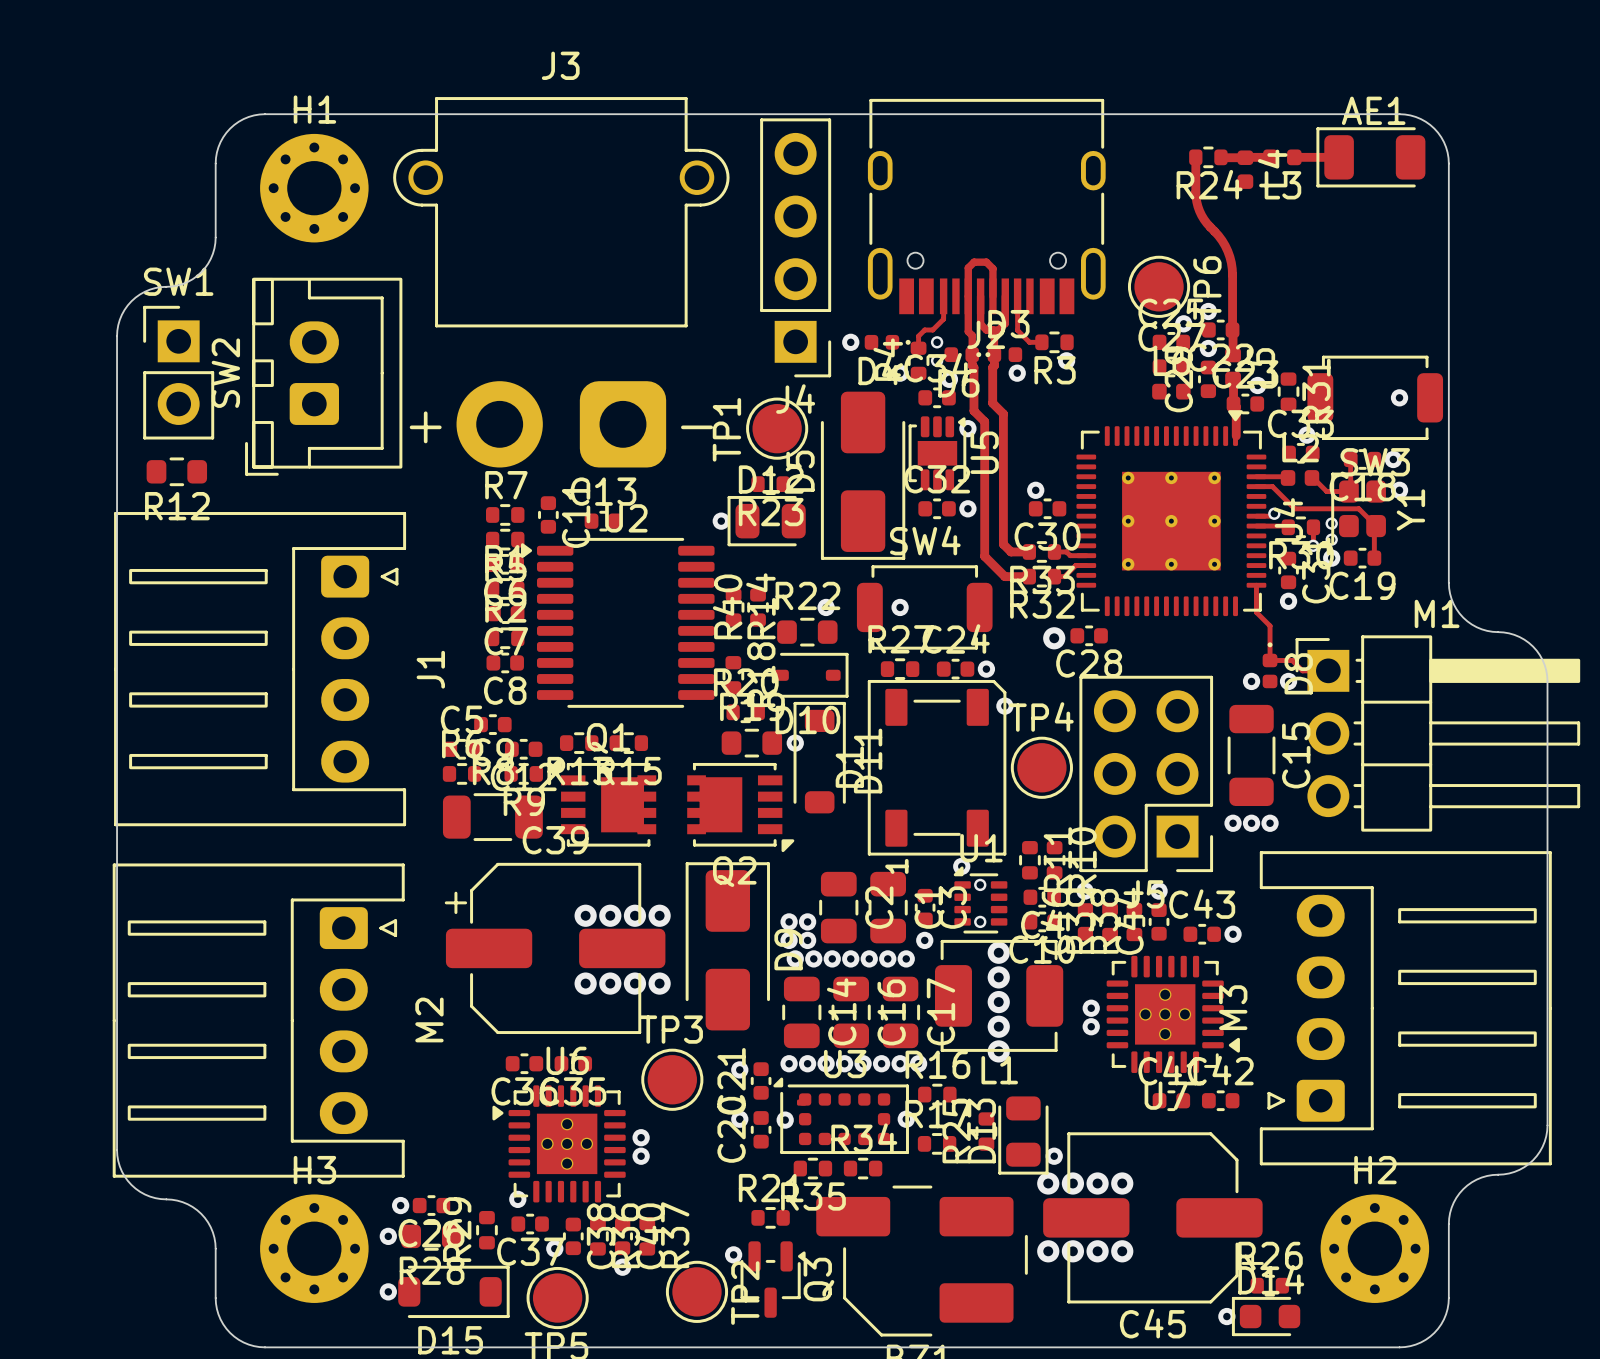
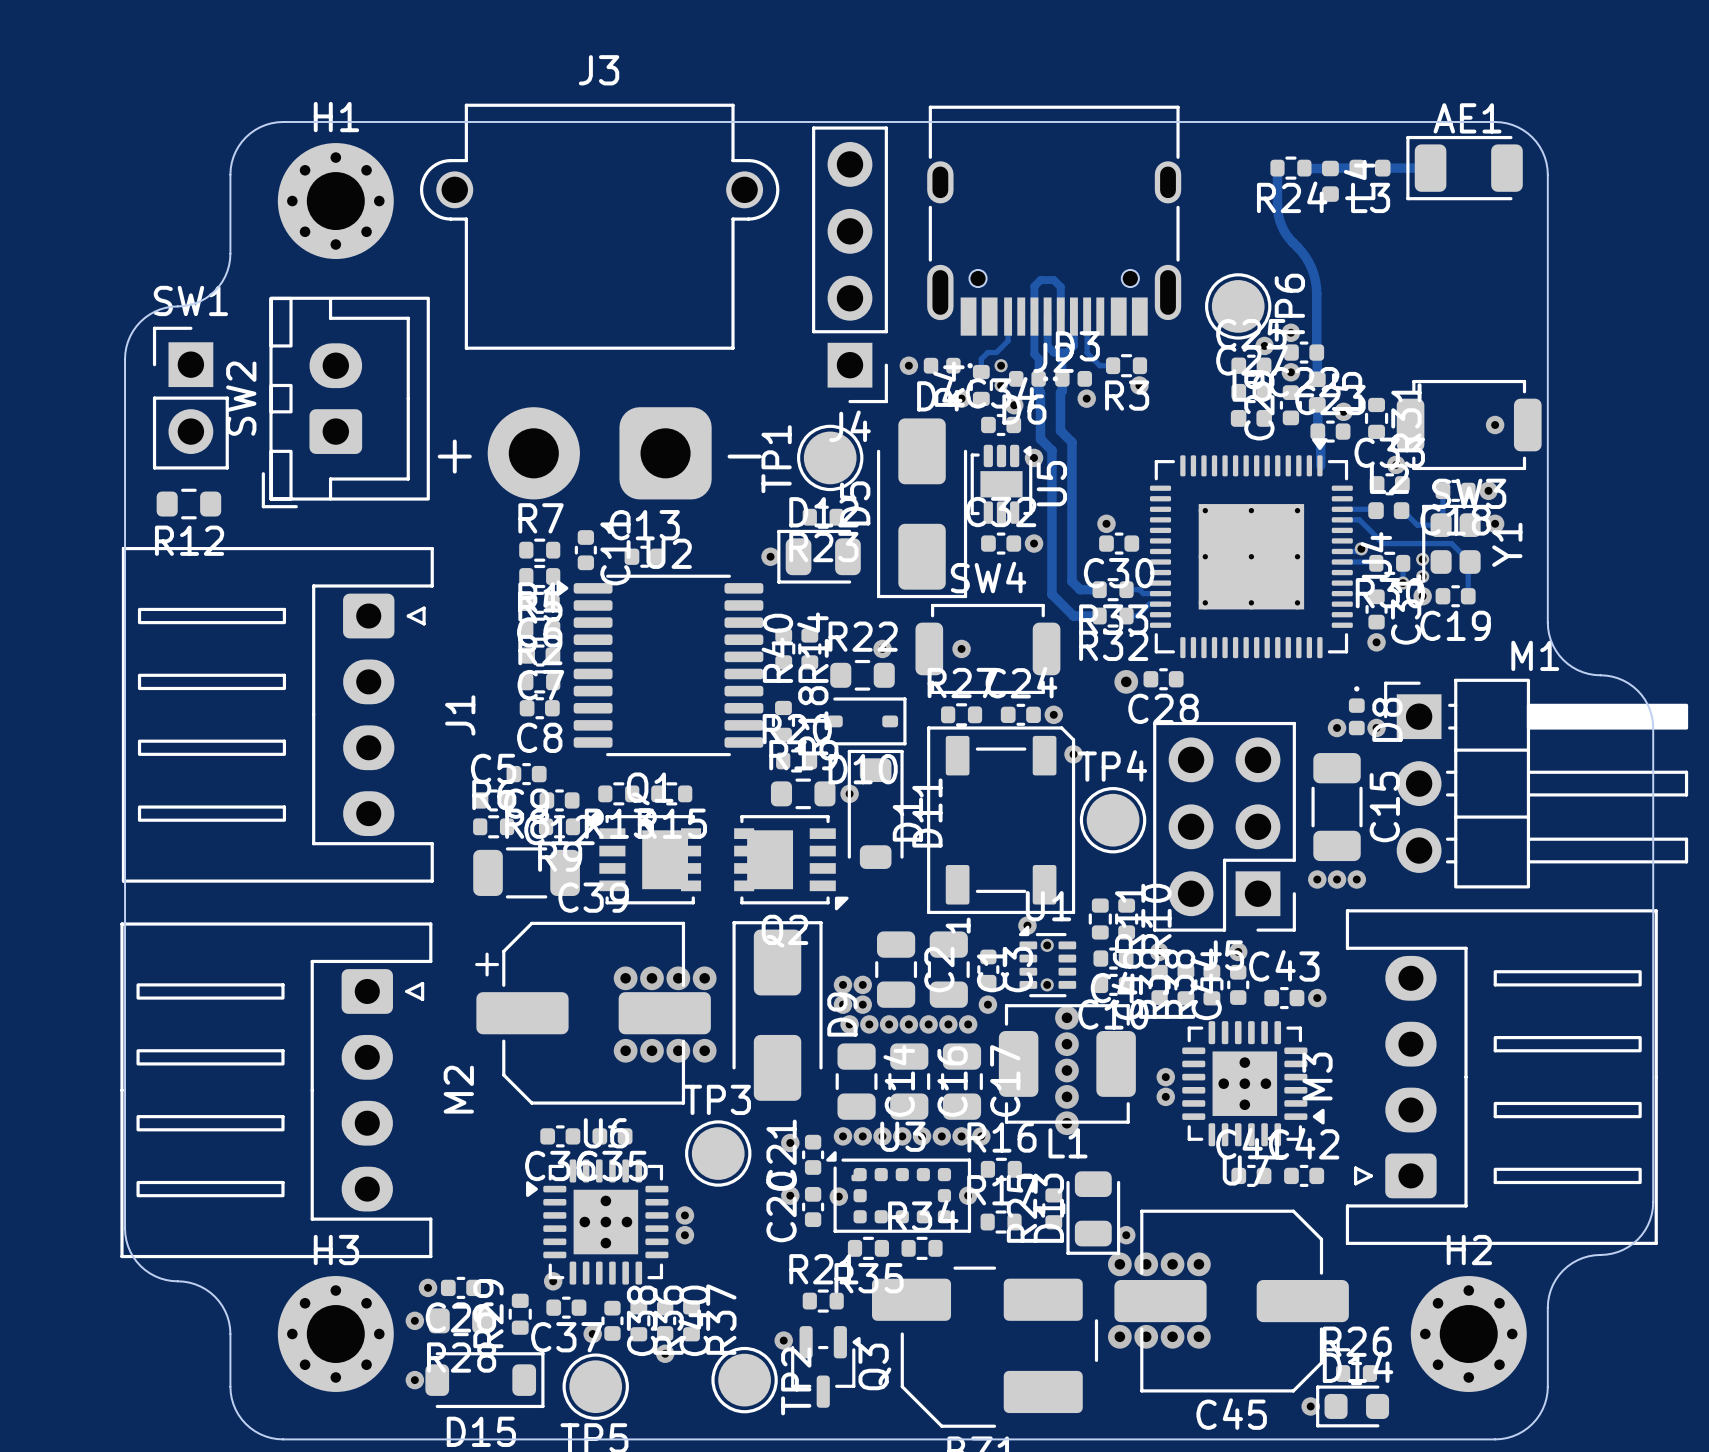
track: (1256, 585) (1256, 612) (1270, 625) (1270, 660) (1292, 660) (1302, 670) (1328, 670) -> none

